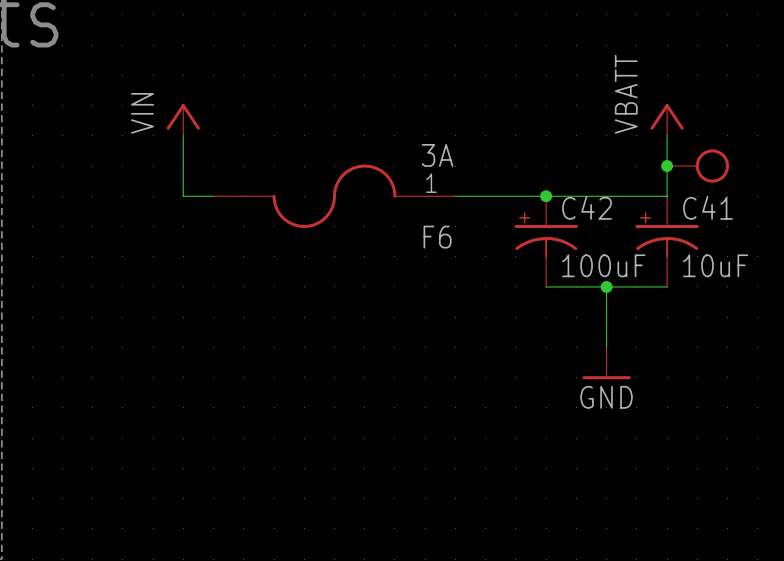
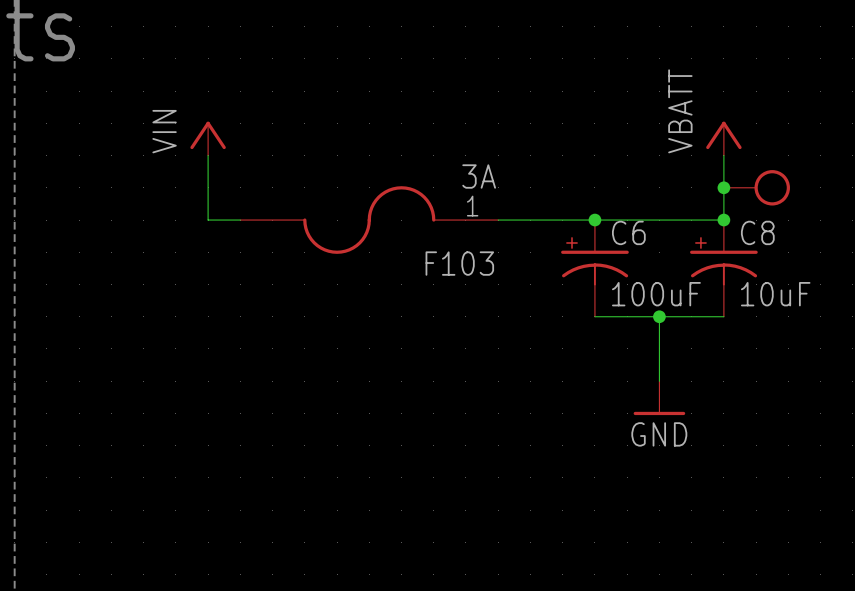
junction: none -> (723, 220)
C42 name: C42 (587, 207) -> C6 (628, 232)
C41 name: C41 (707, 207) -> C8 (757, 232)
F6 name: F6 (437, 237) -> F103 (459, 263)

